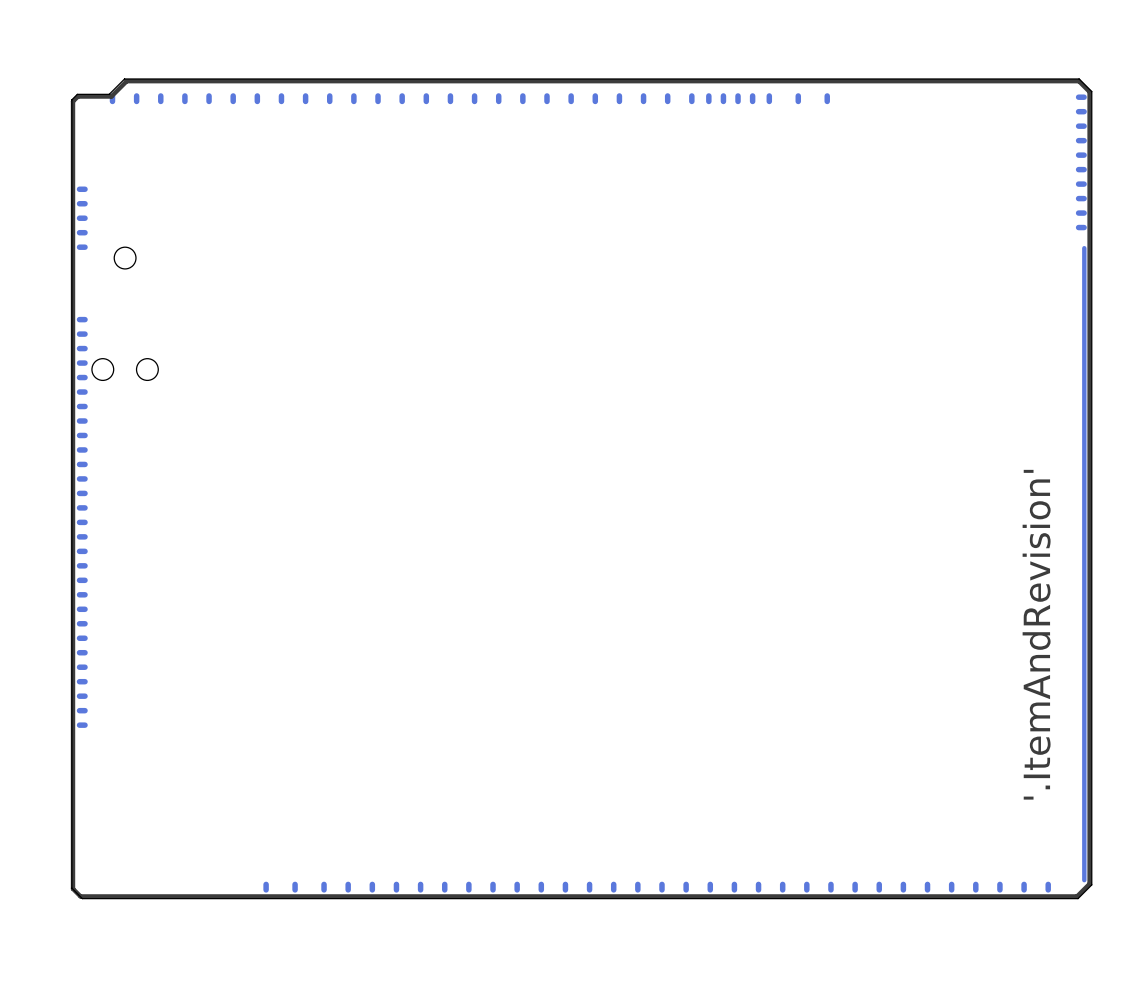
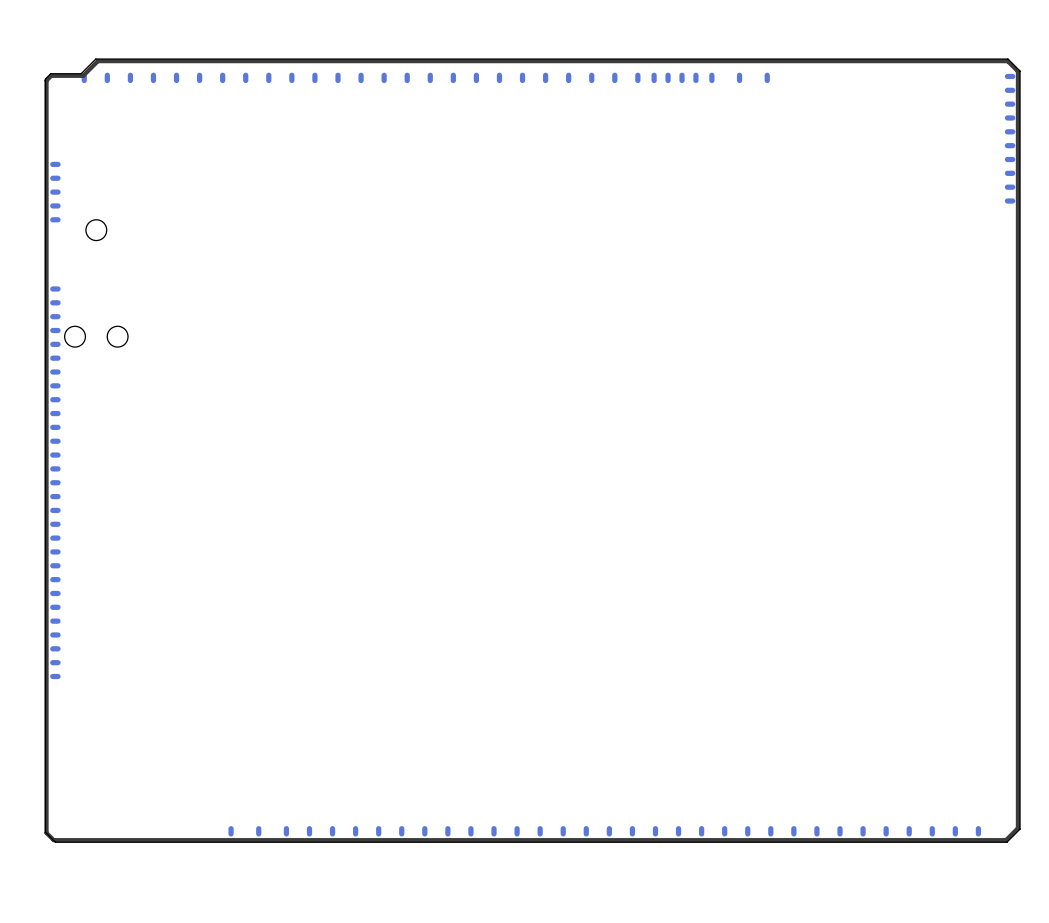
part footprint: [70, 78, 1092, 899] -> [44, 59, 1021, 843]
text: '.ItemAndRevision' (1036, 634) -> none

